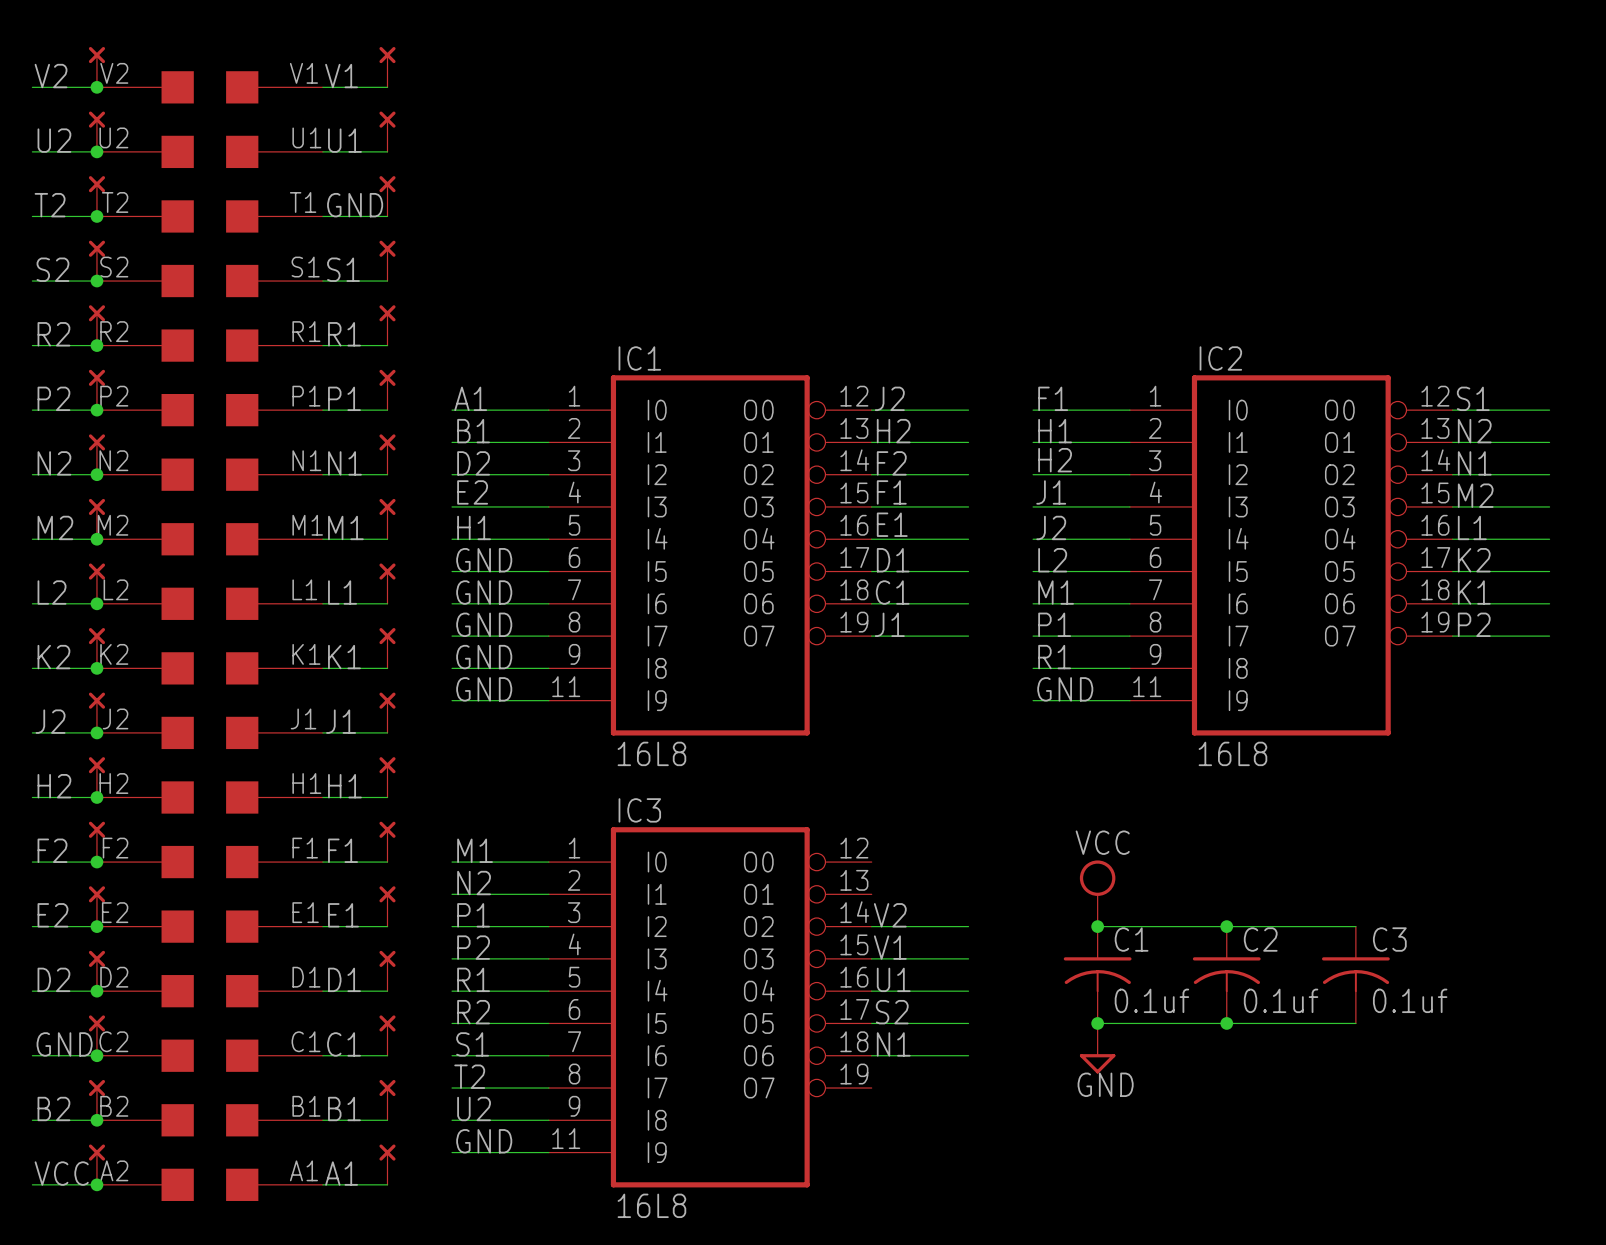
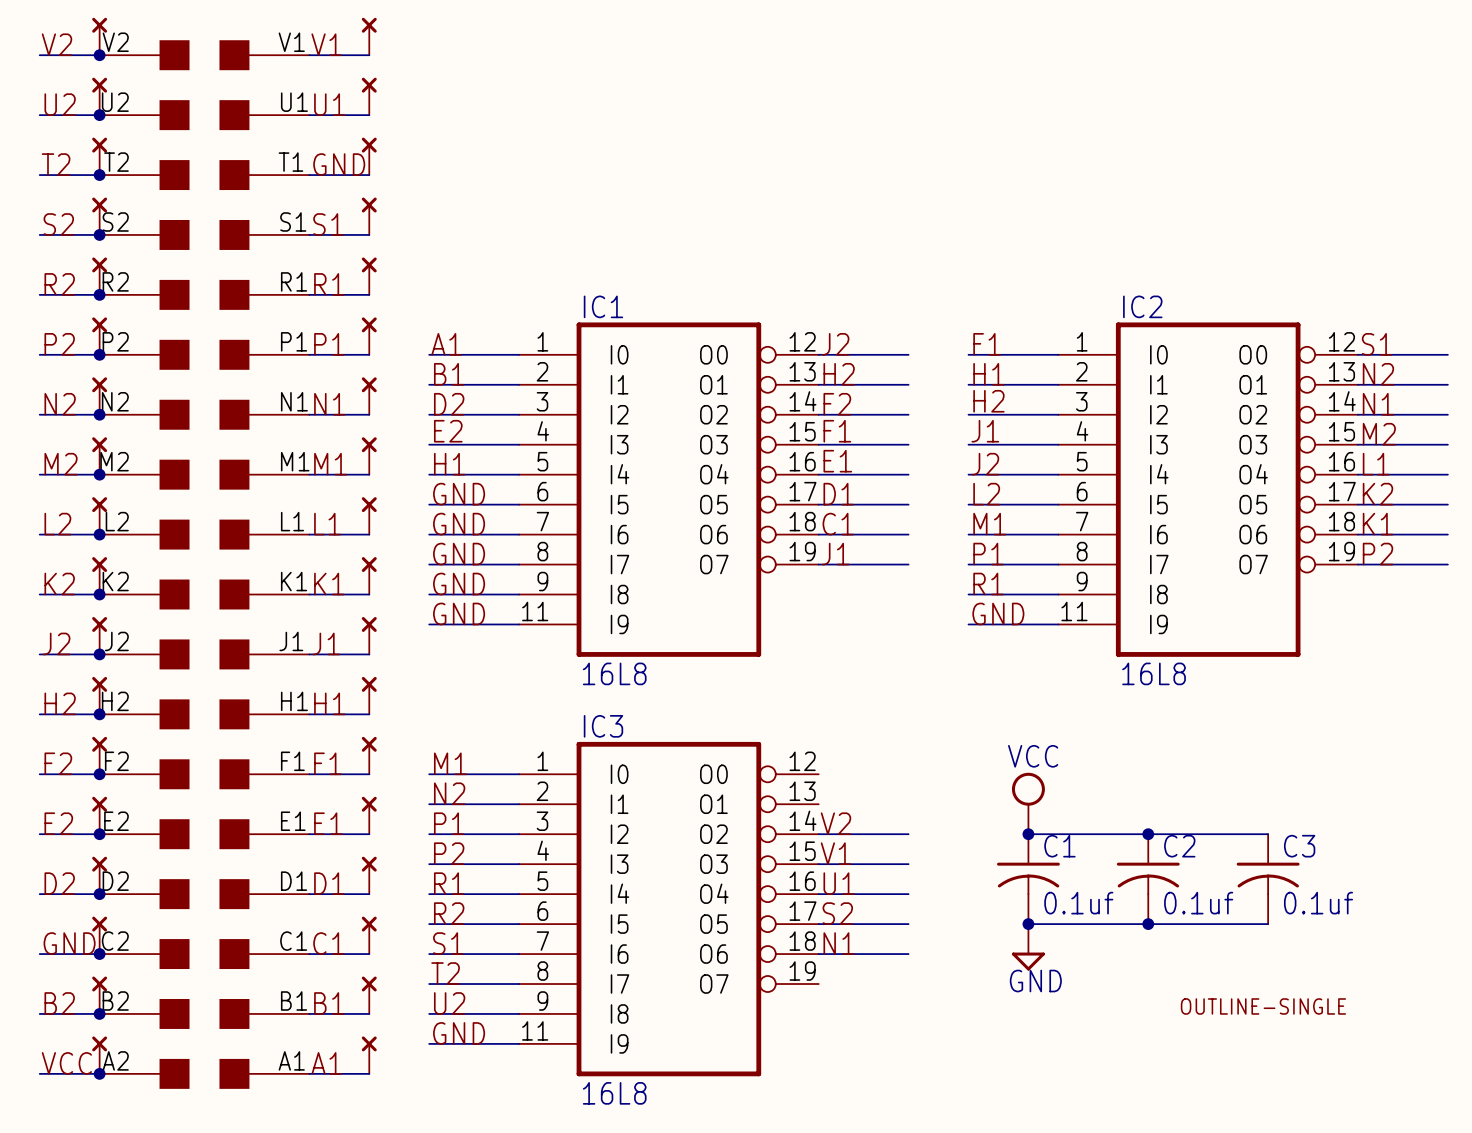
part: none -> OUTLINE-SINGLE (1263, 1006)

